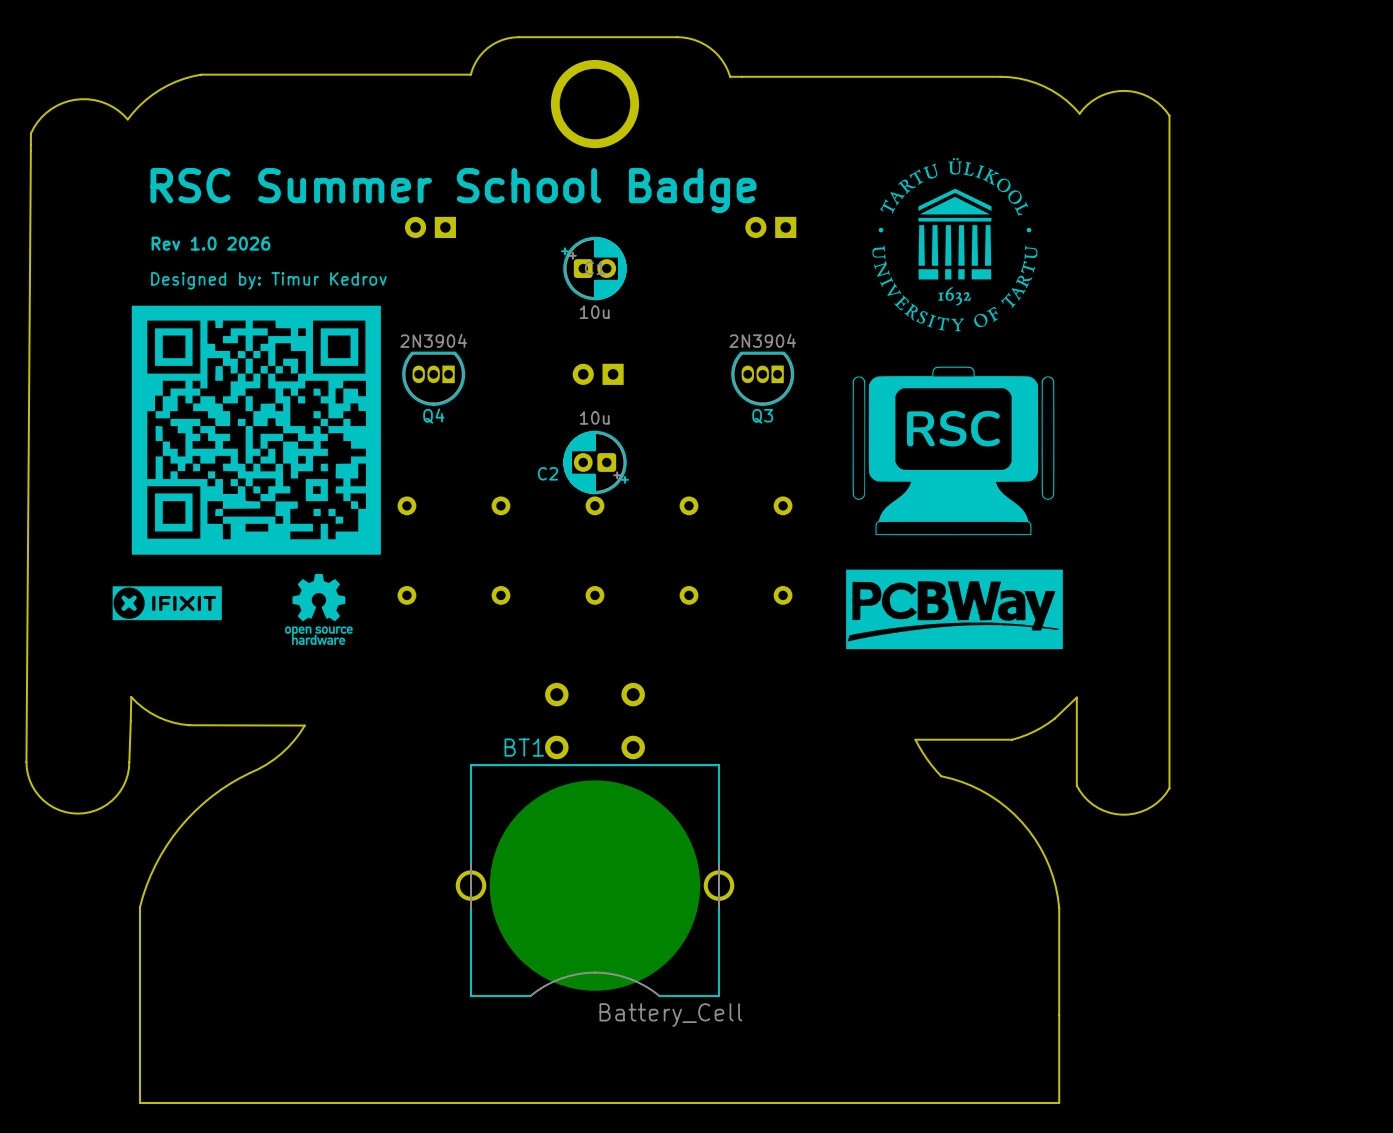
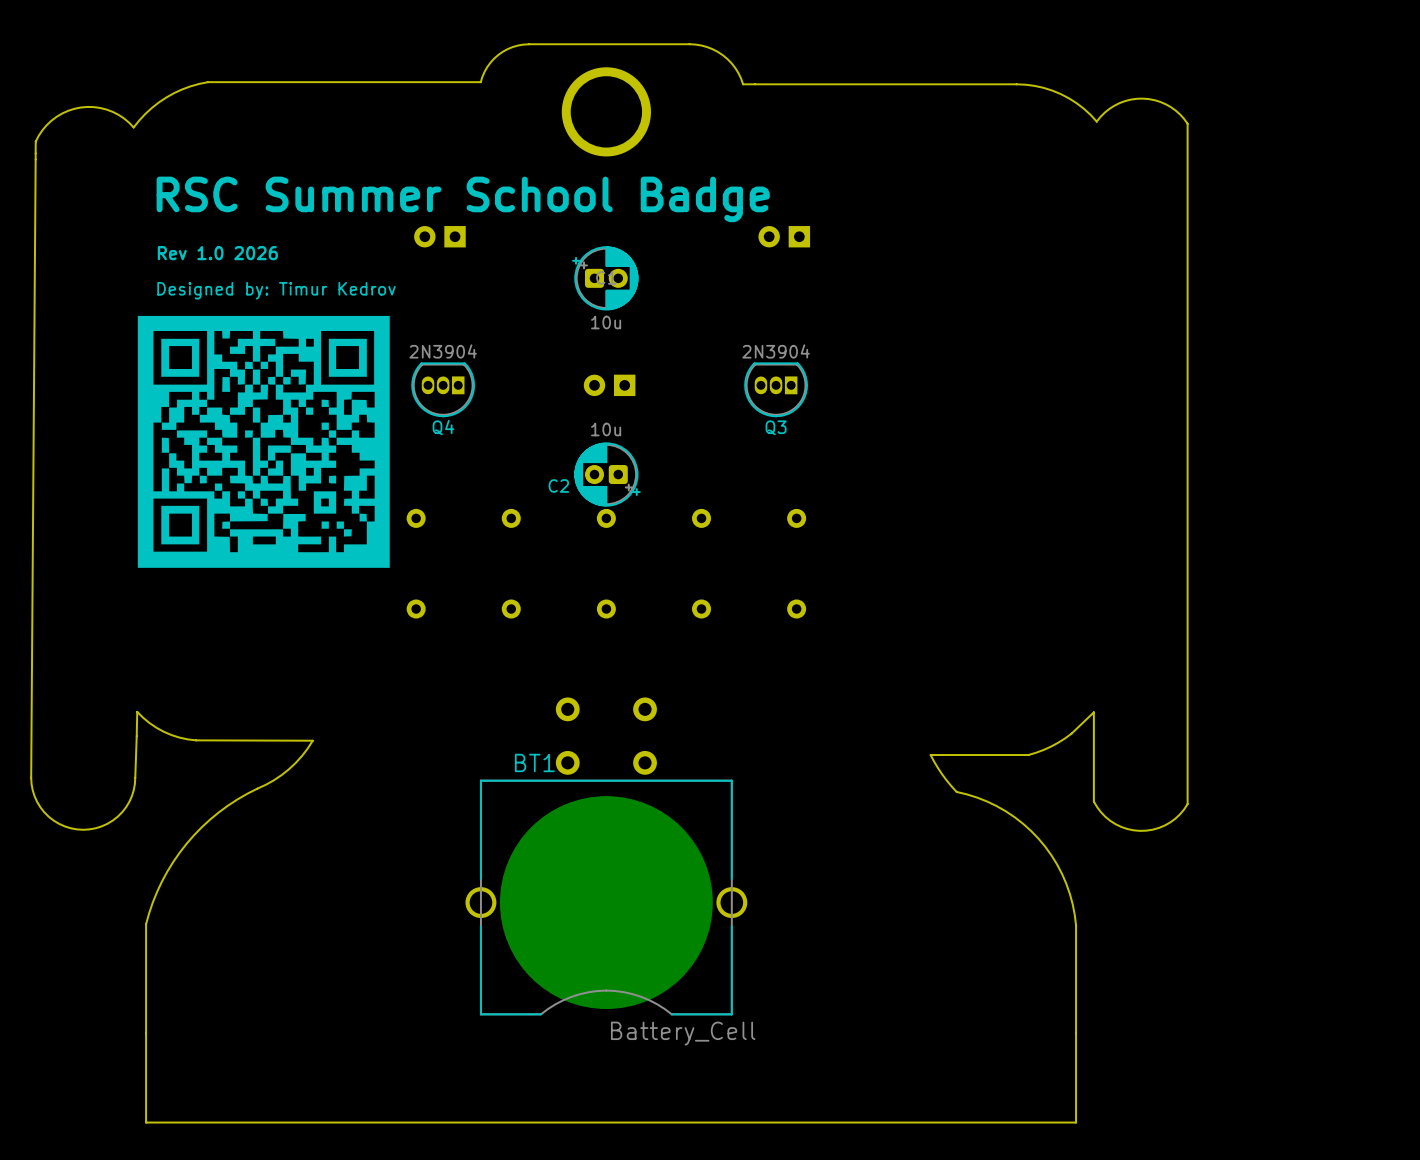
drawing: [872, 157, 1038, 332] -> none
drawing: [852, 366, 1055, 536] -> none
drawing: [846, 569, 1063, 650] -> none
drawing: [285, 573, 353, 645] -> none
drawing: [112, 586, 222, 621] -> none

